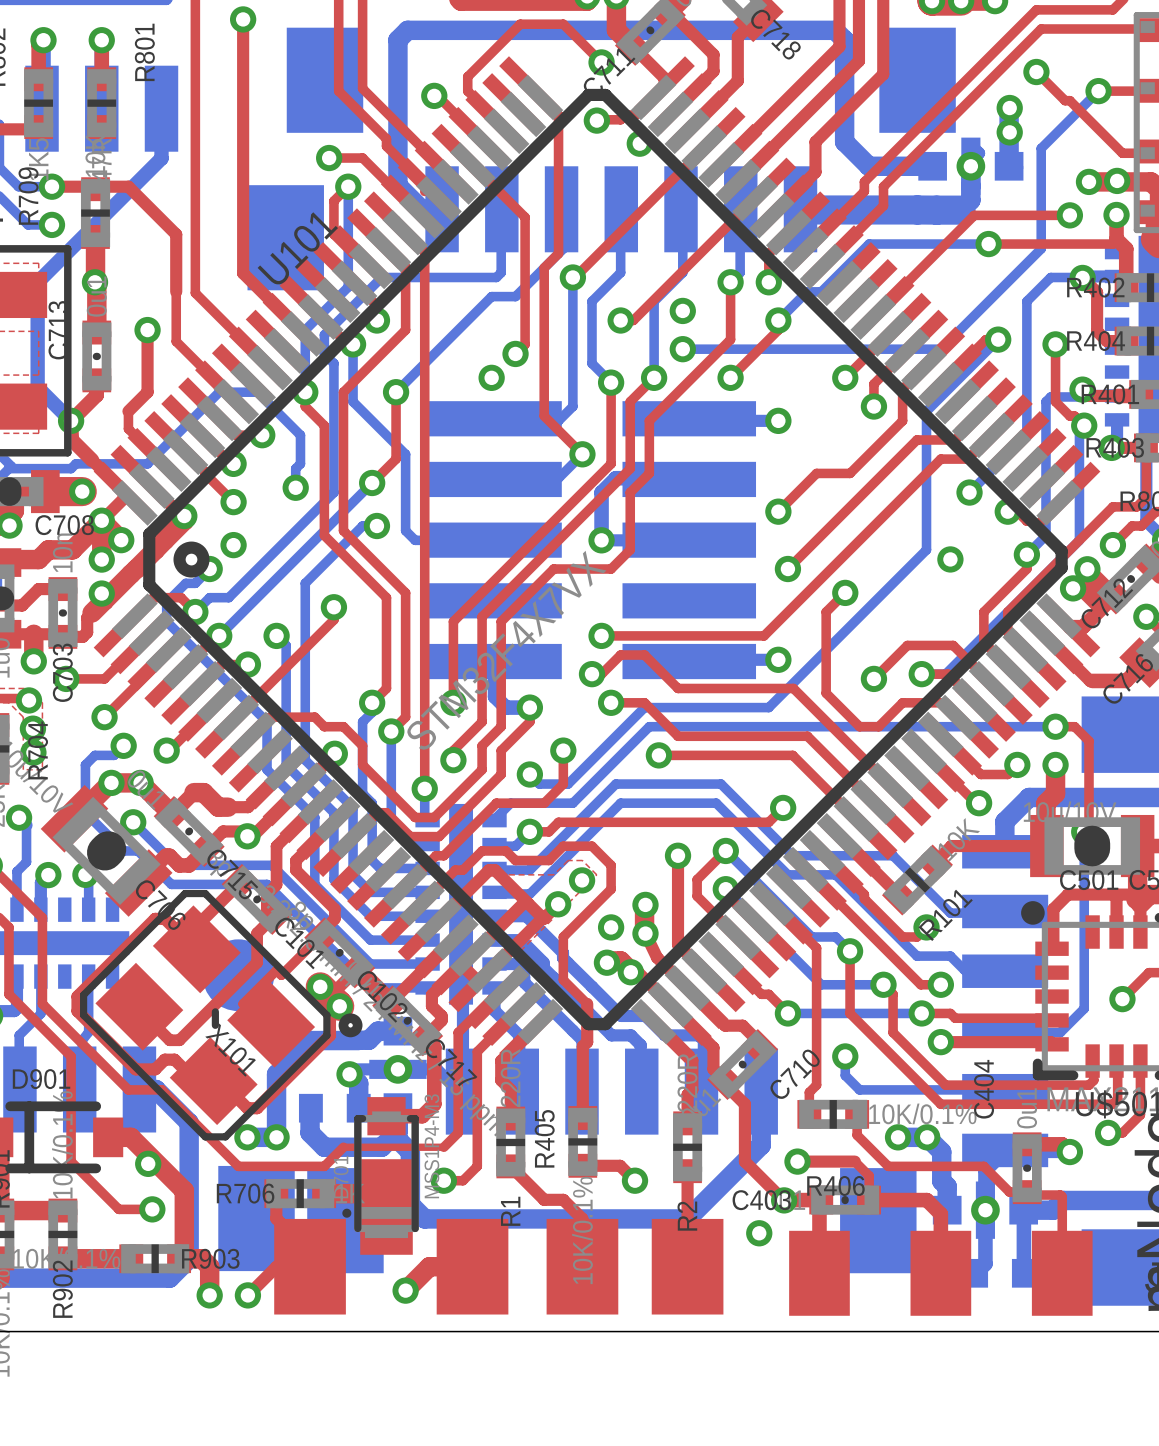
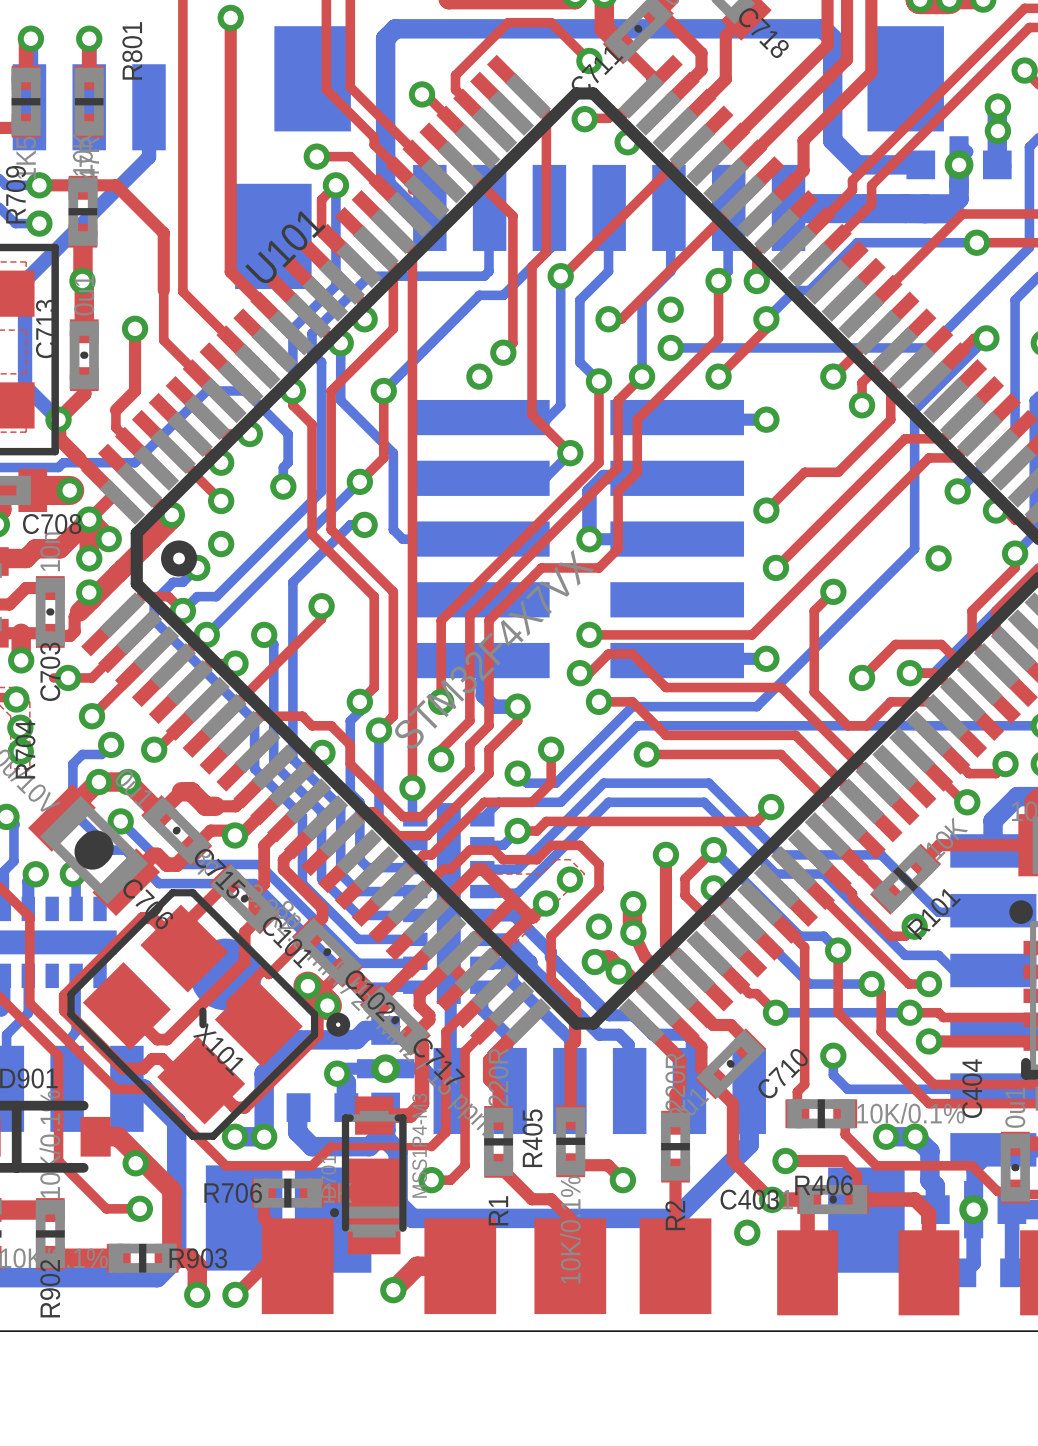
via position: (66, 678) -> (68, 677)

